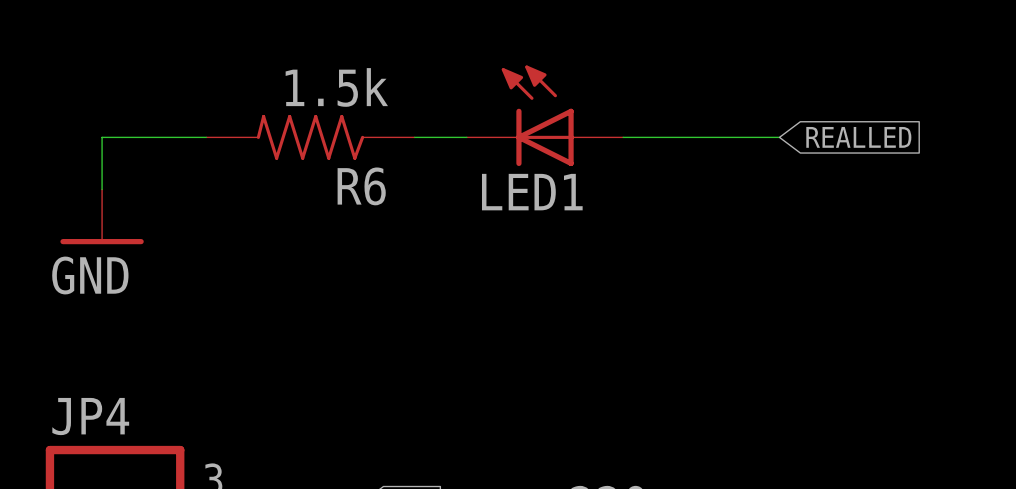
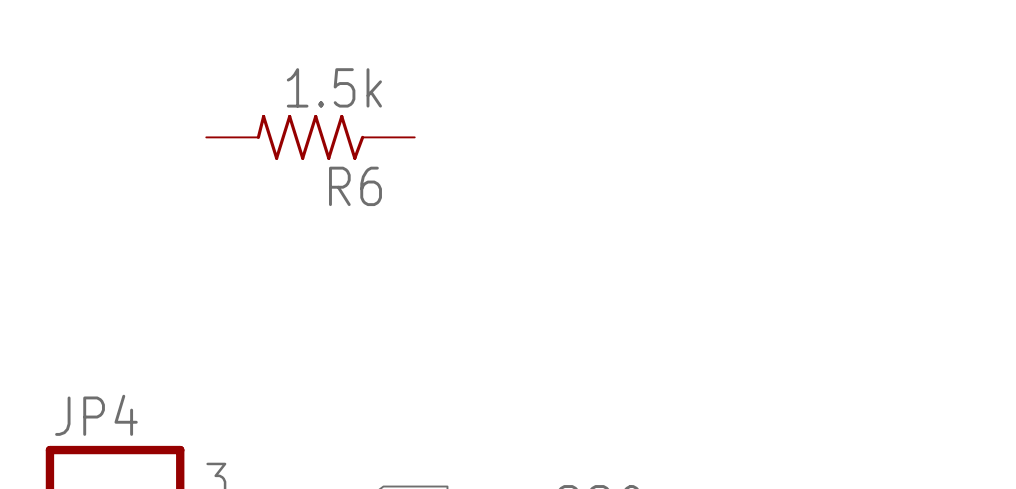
LED1: (545, 115) -> none
wire: (206, 137) (102, 137) (102, 189) -> none
wire: (414, 137) (466, 137) -> none
wire: (623, 137) (779, 137) -> none
global label: REALLED (858, 137) -> none
power symbol: GND (102, 216) -> none

